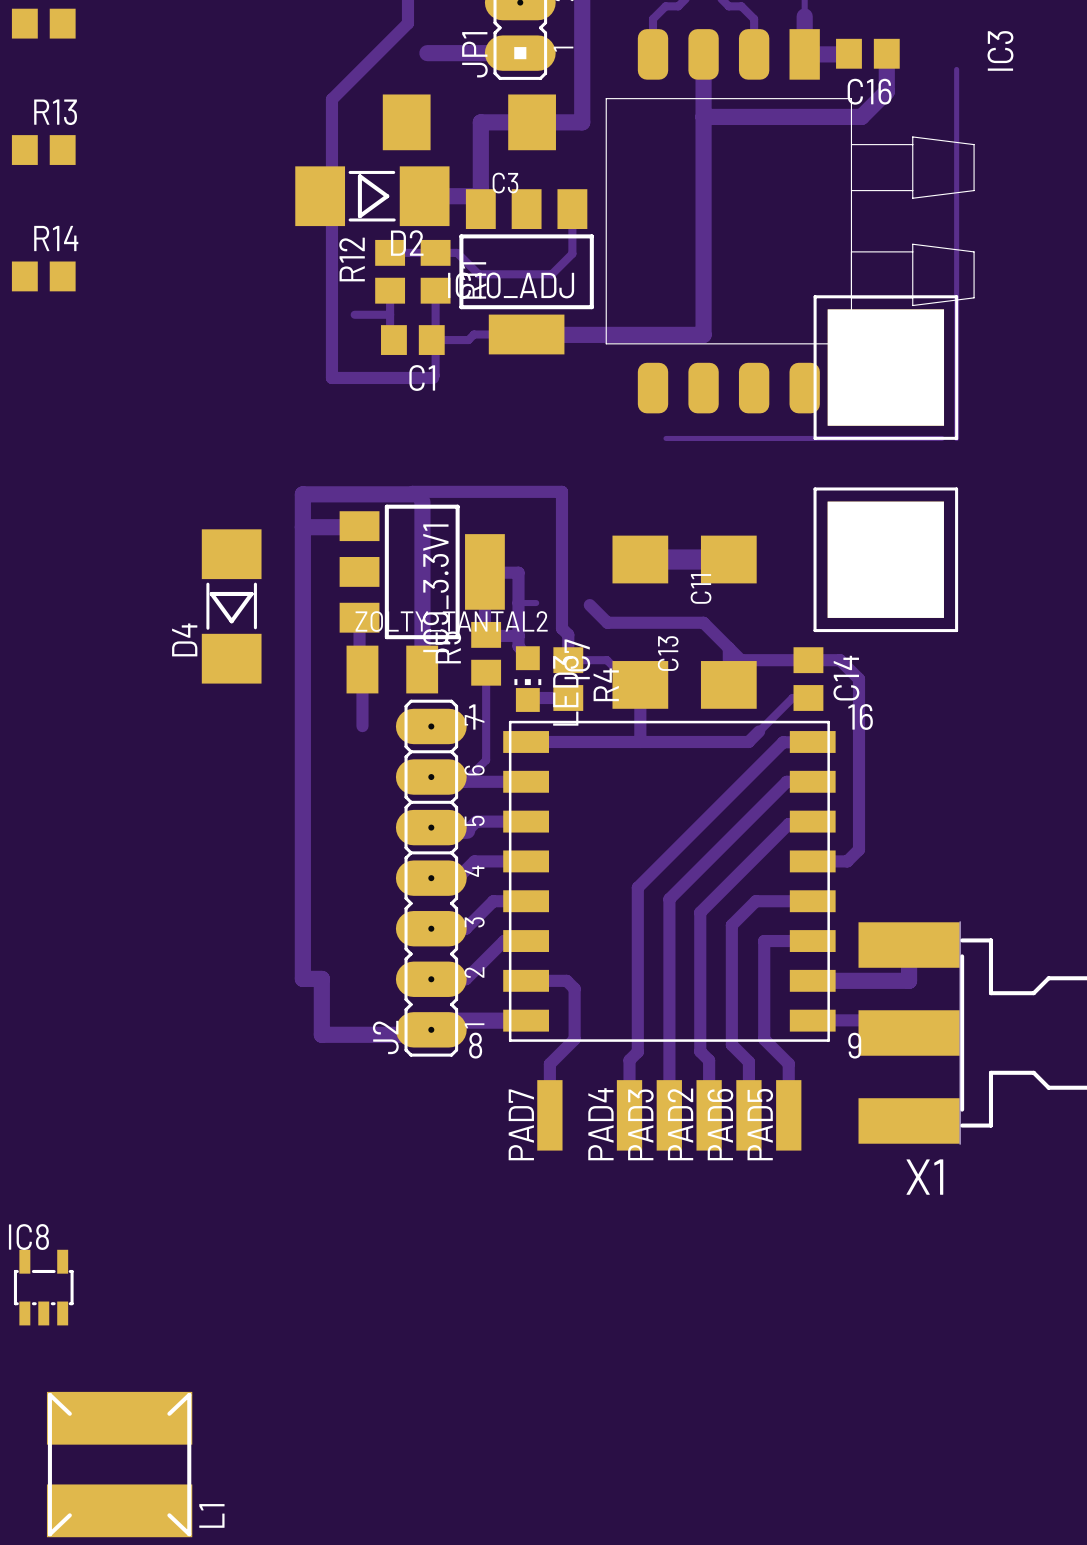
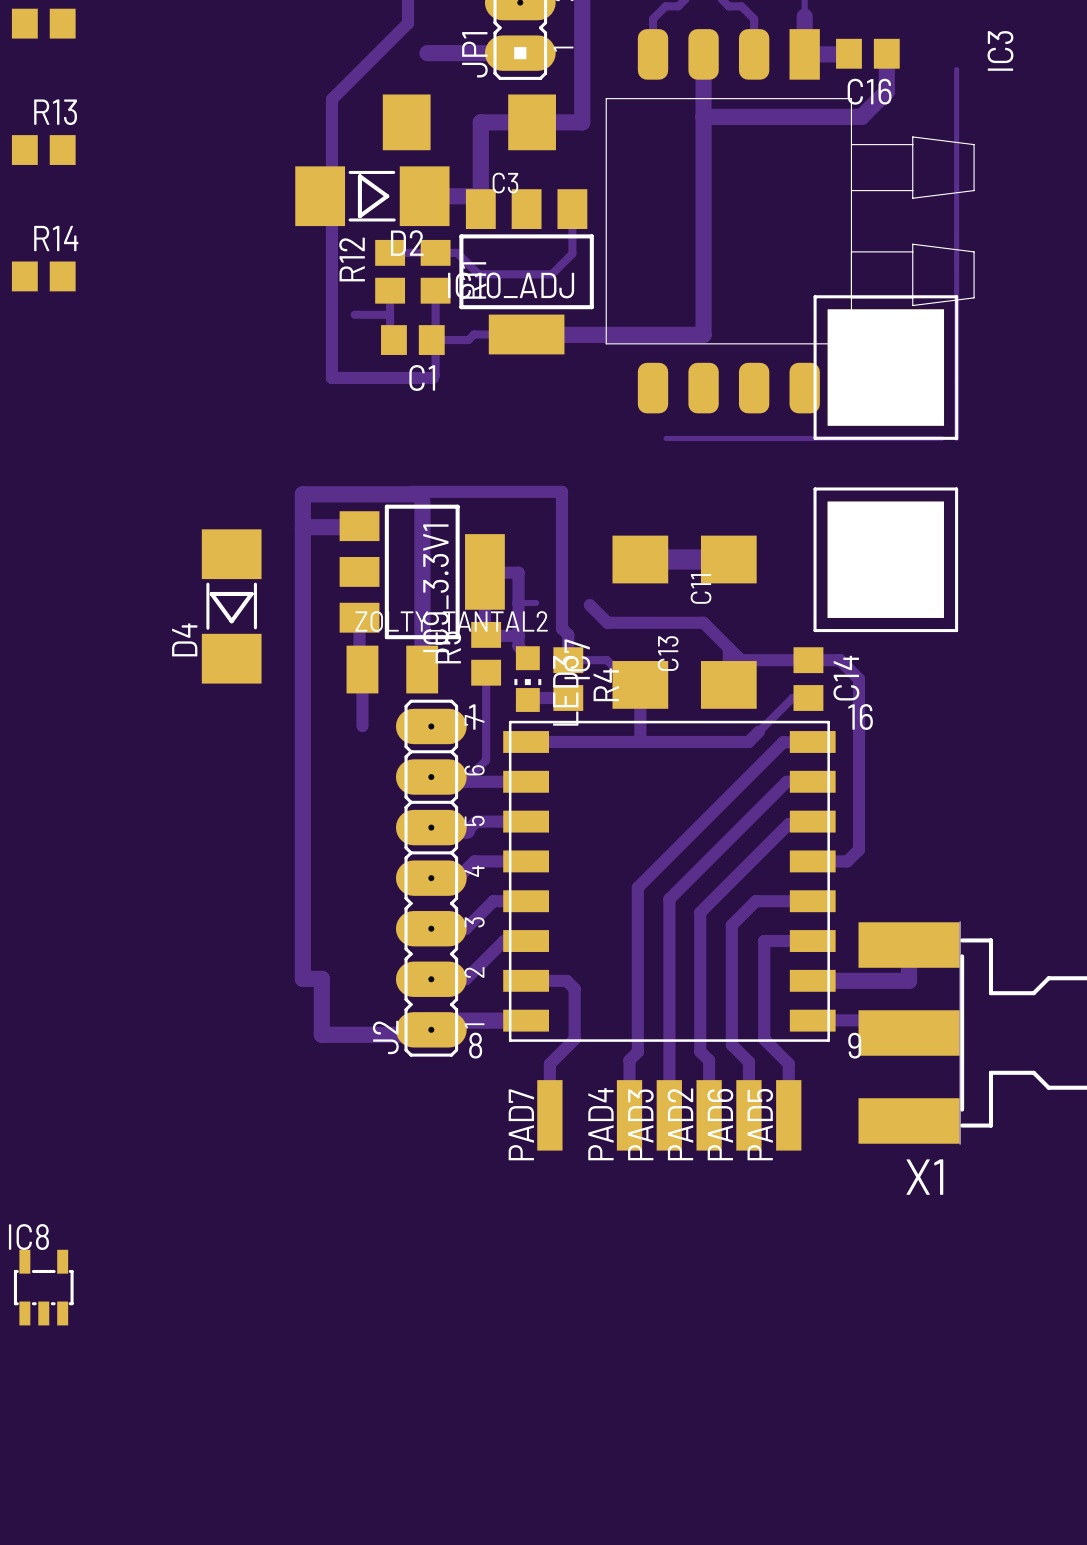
L1: (119, 1464) -> none

